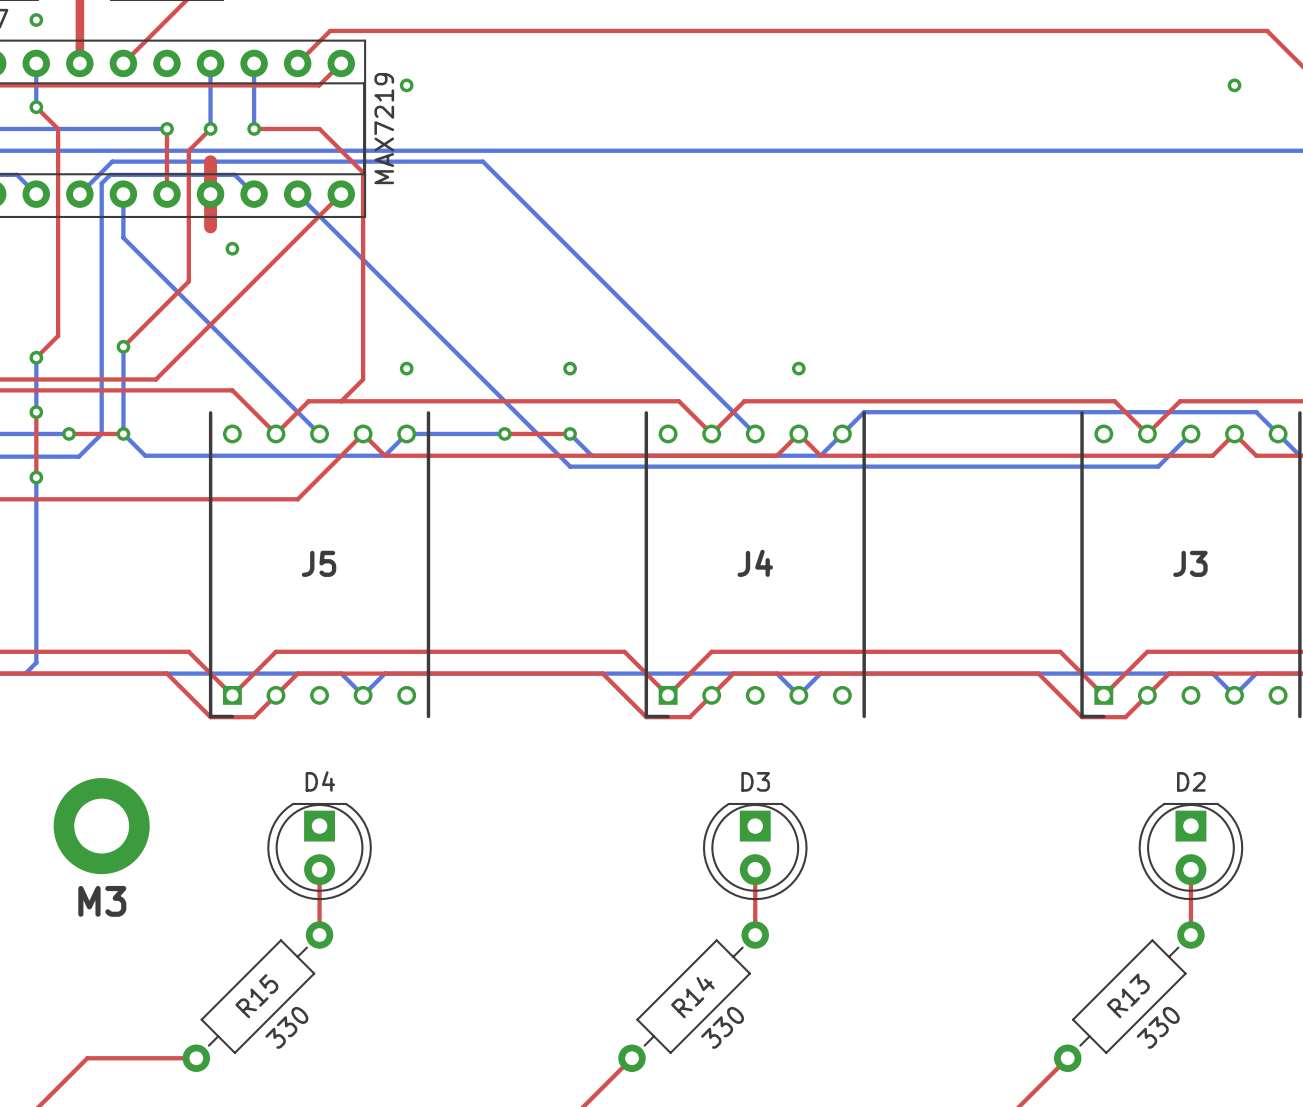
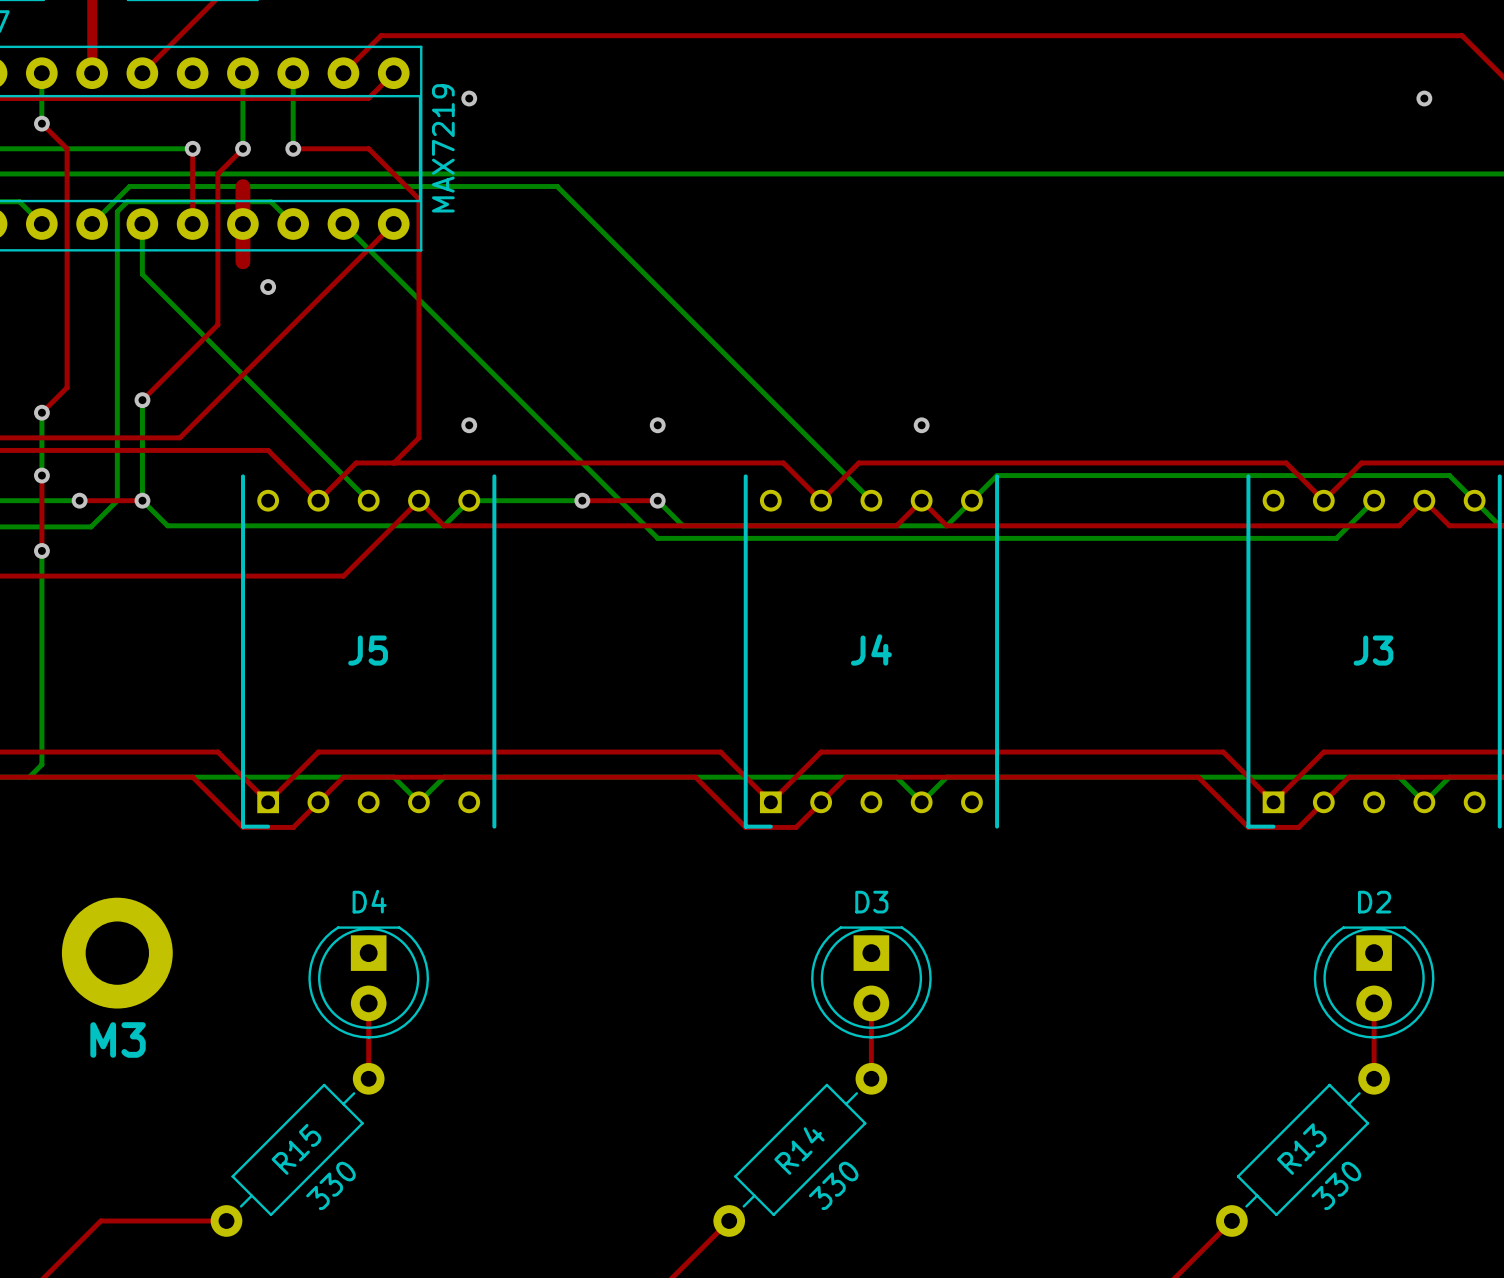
via: (36, 20) -> none

